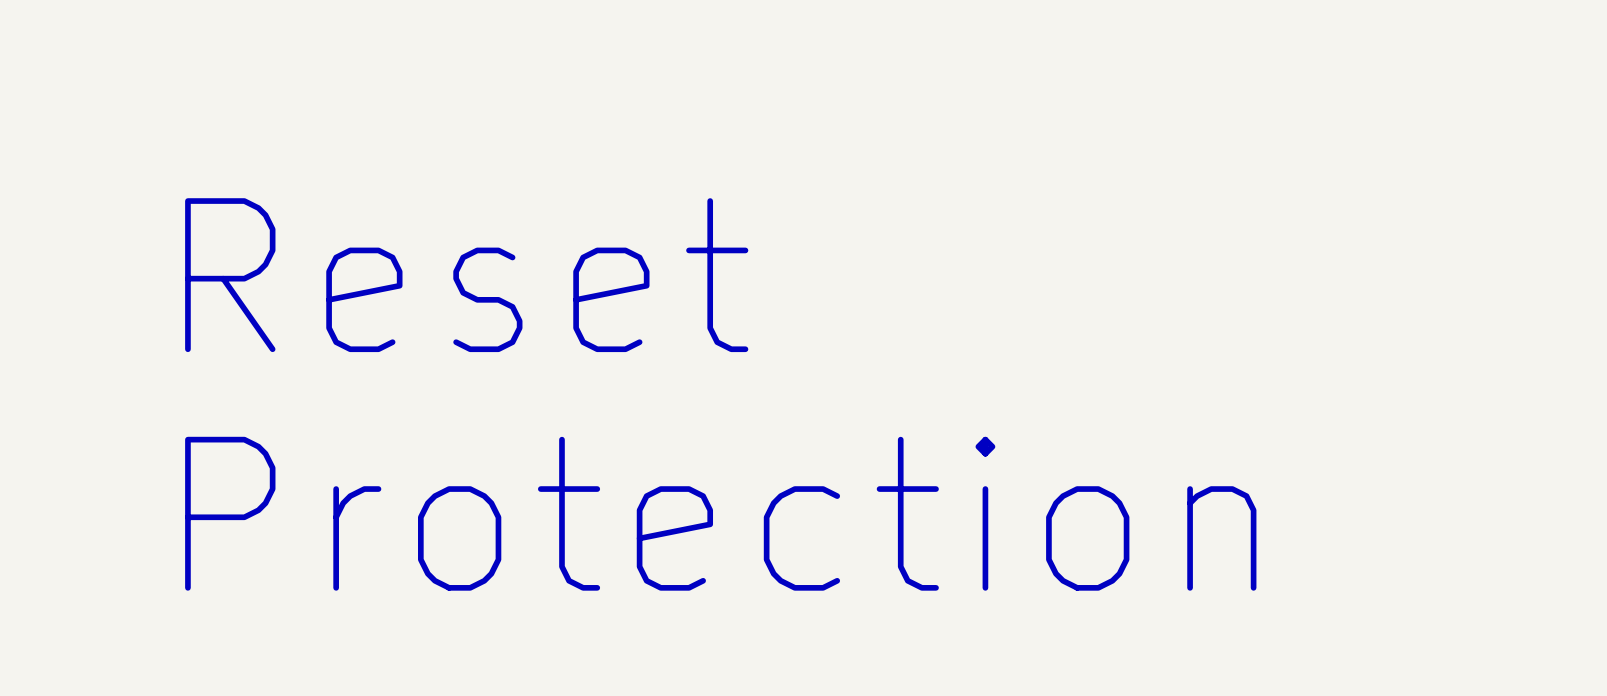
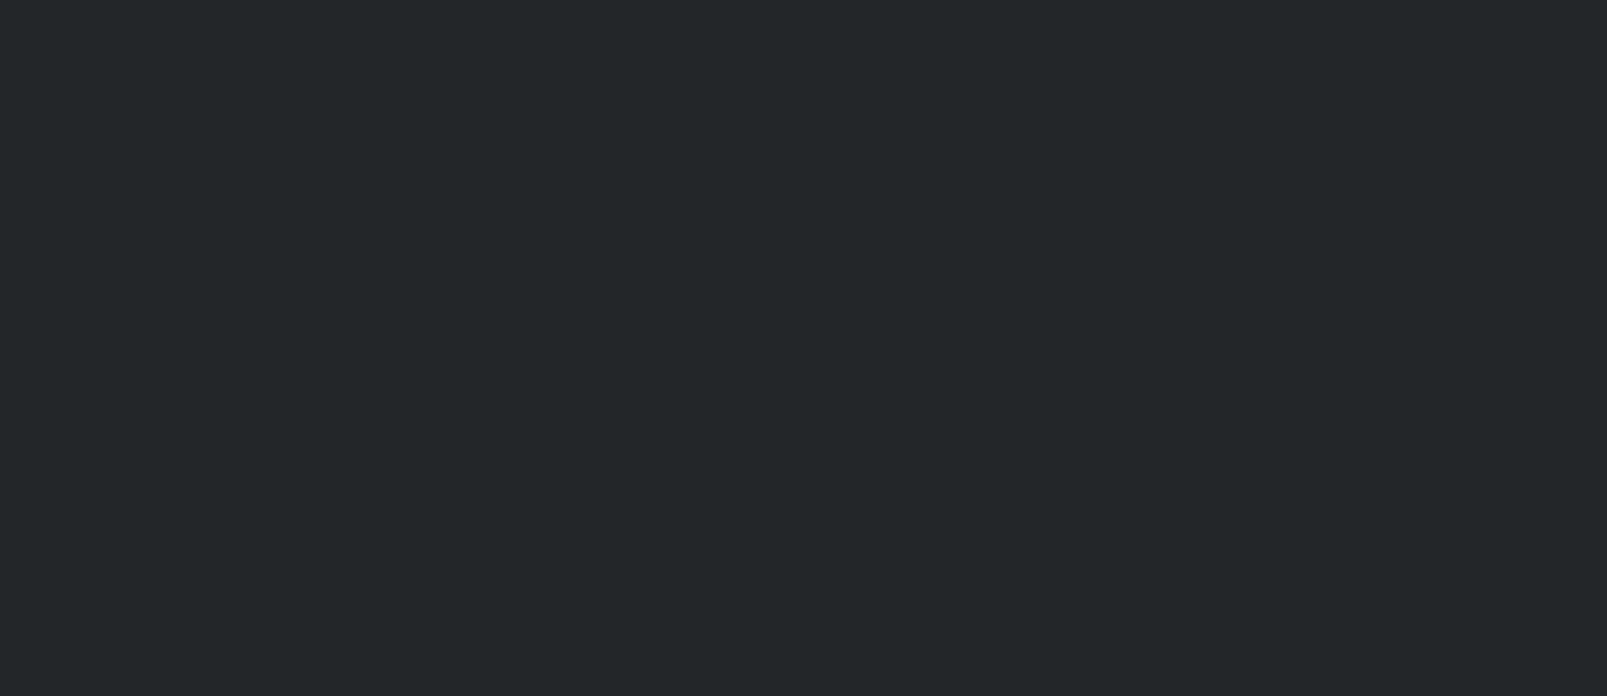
text: Reset (466, 275) -> none
text: Protection (720, 513) -> none

